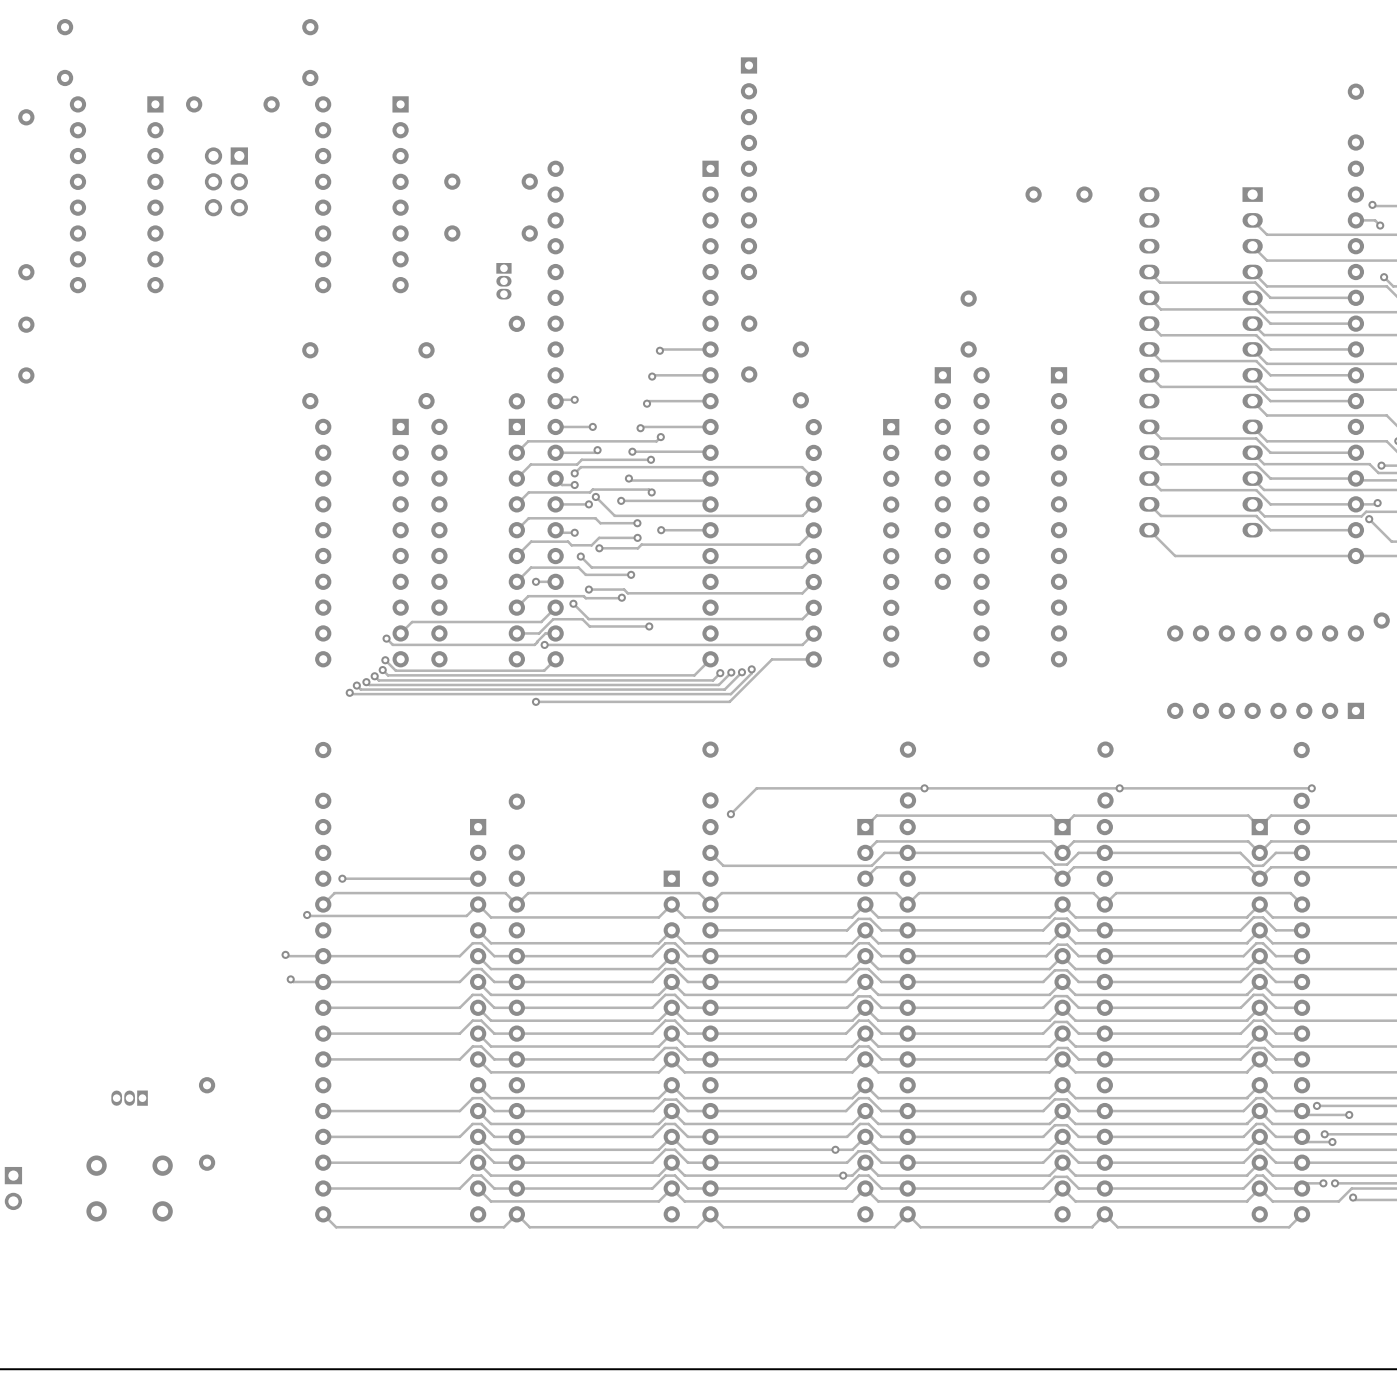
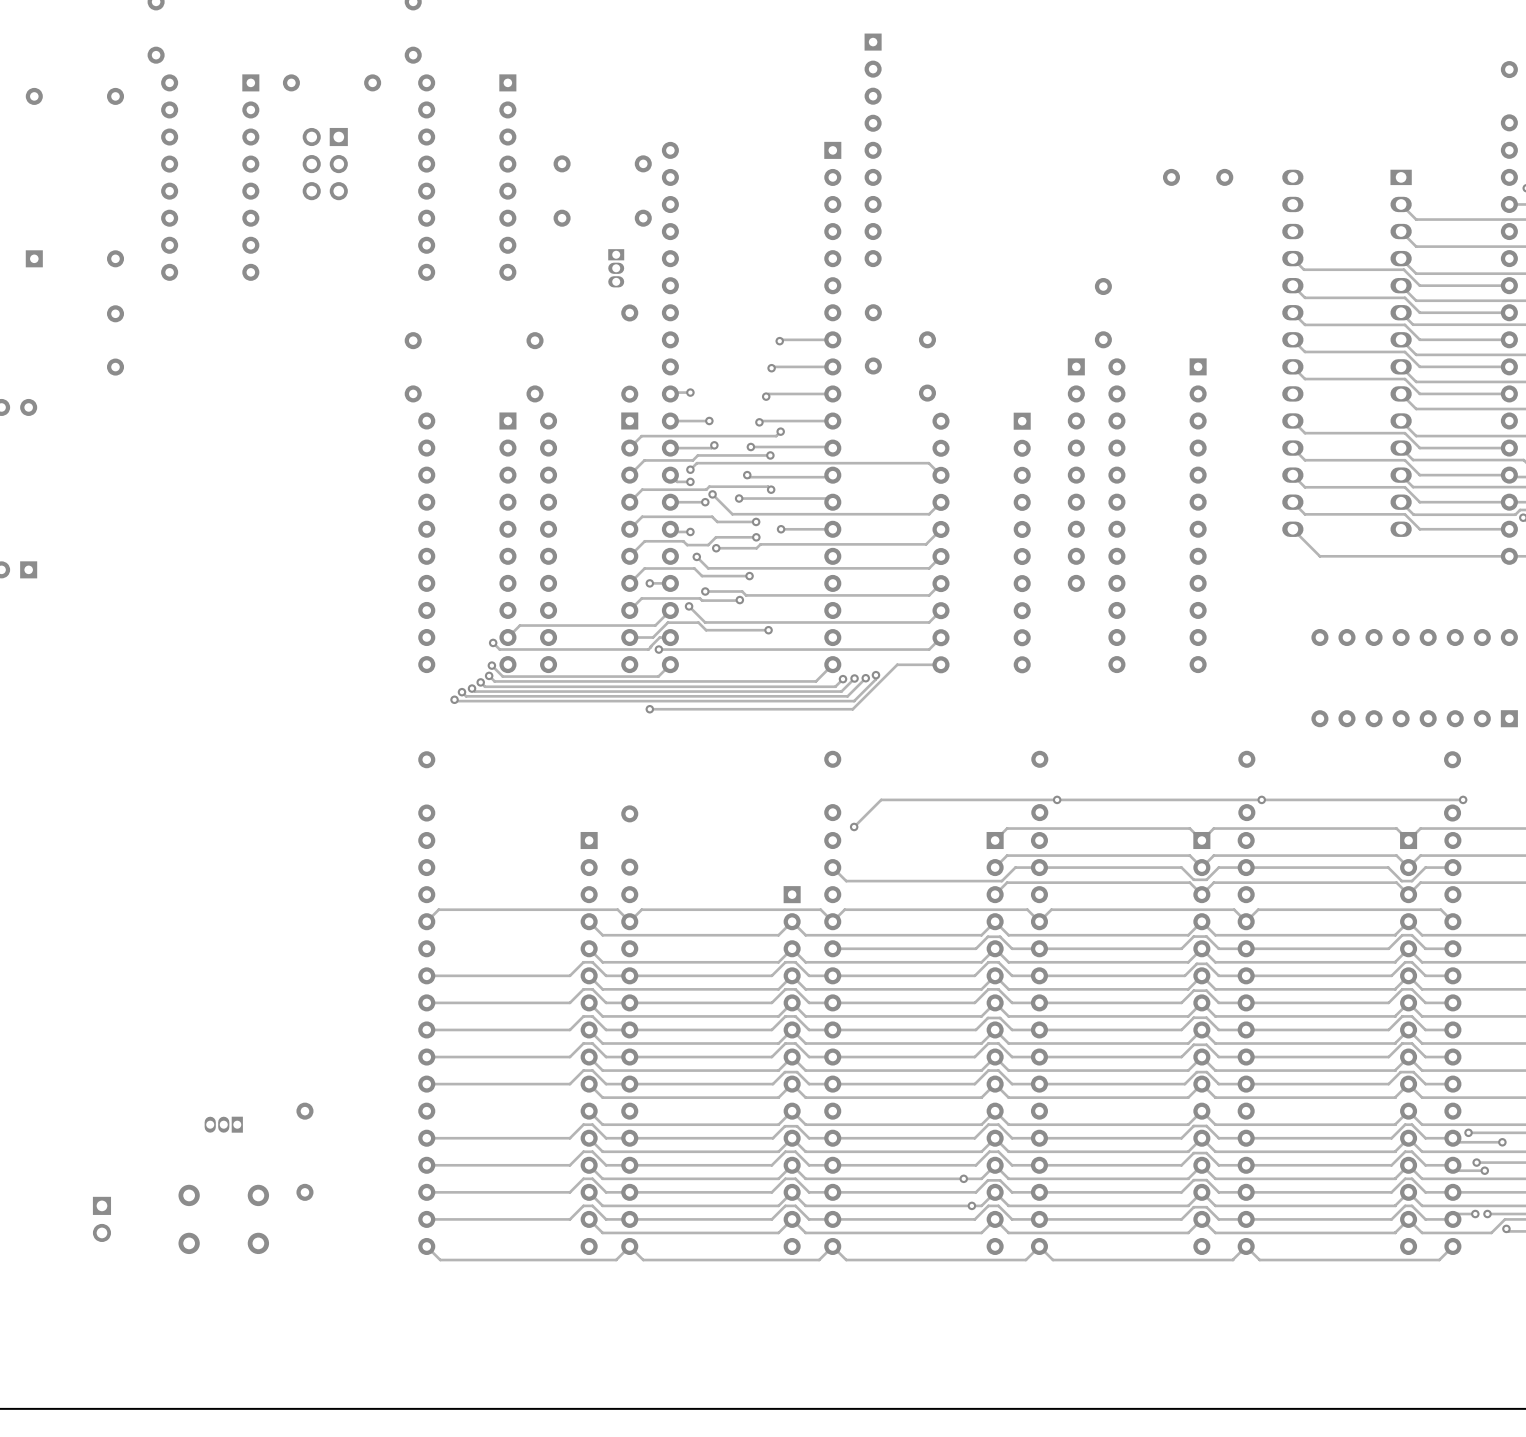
via: (342, 878) -> none
track: (478, 878) (342, 878) -> none
track: (478, 904) (466, 915) (307, 914) -> none
via: (307, 914) -> none
track: (285, 954) (323, 956) -> none
via: (285, 954) -> none
track: (290, 979) (293, 981) (323, 981) -> none
via: (290, 979) -> none

